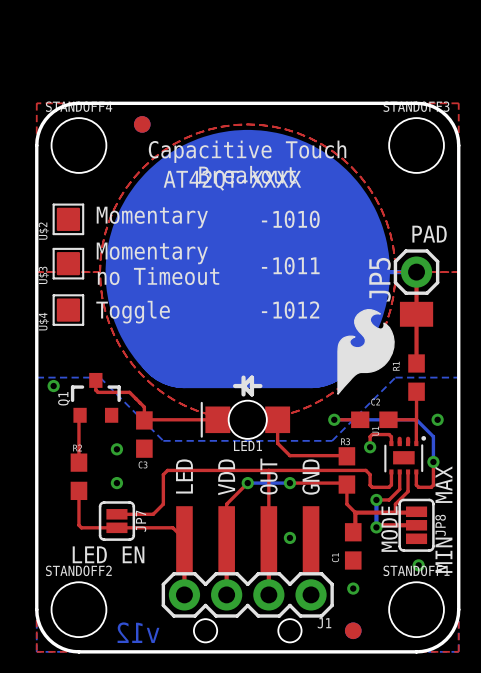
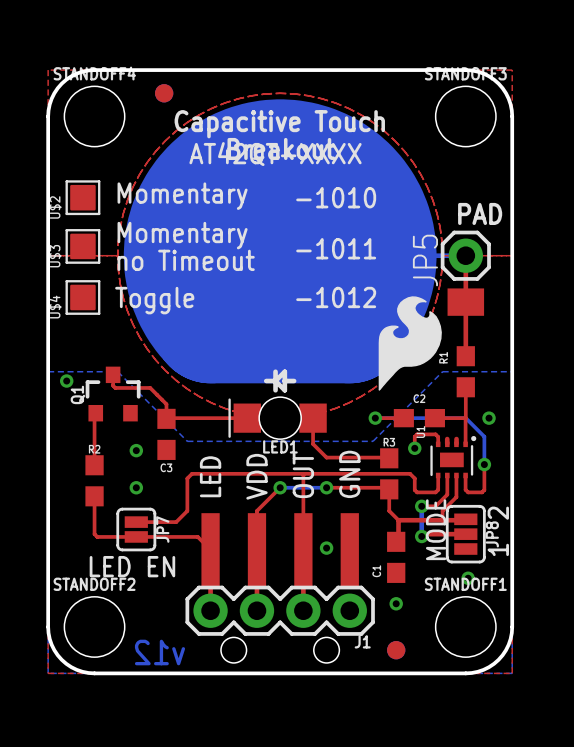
text: MAX (443, 484) -> none
text: none -> 2 (498, 513)
text: none -> 1 (498, 549)
text: MIN (443, 555) -> none

